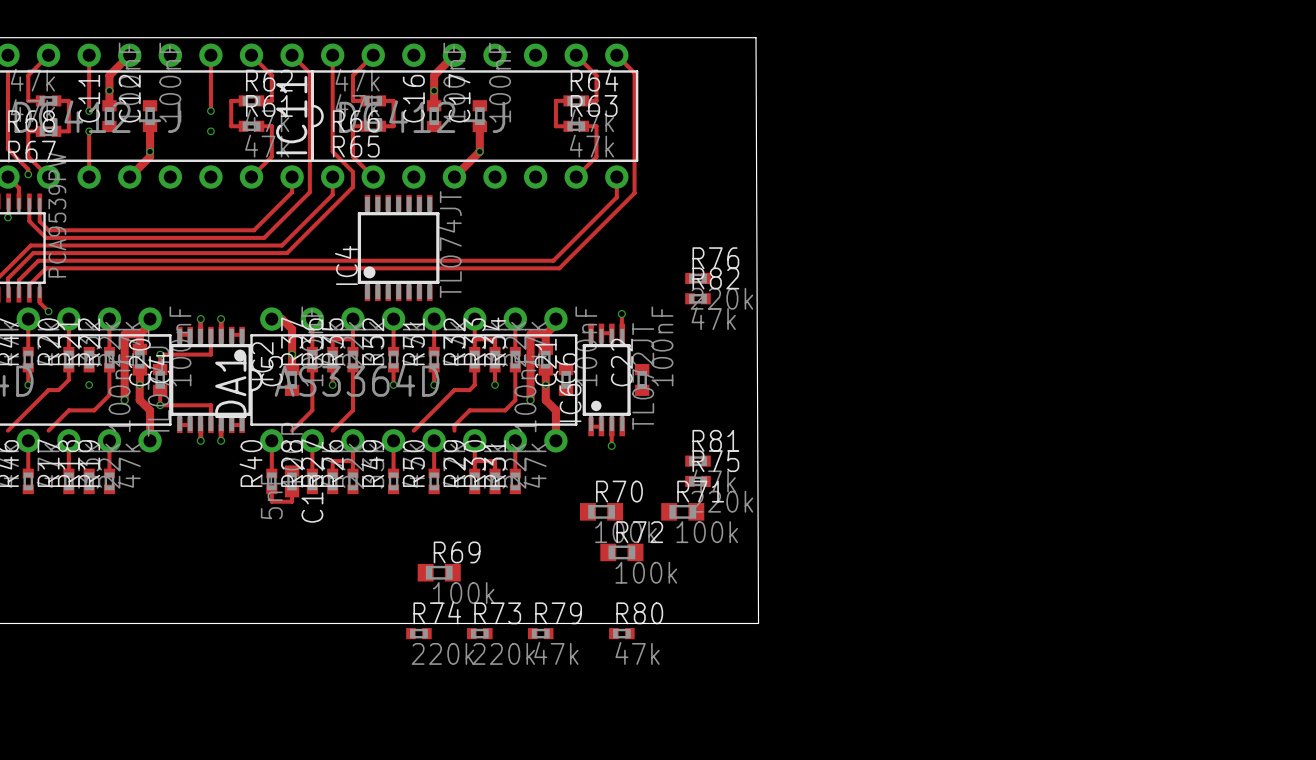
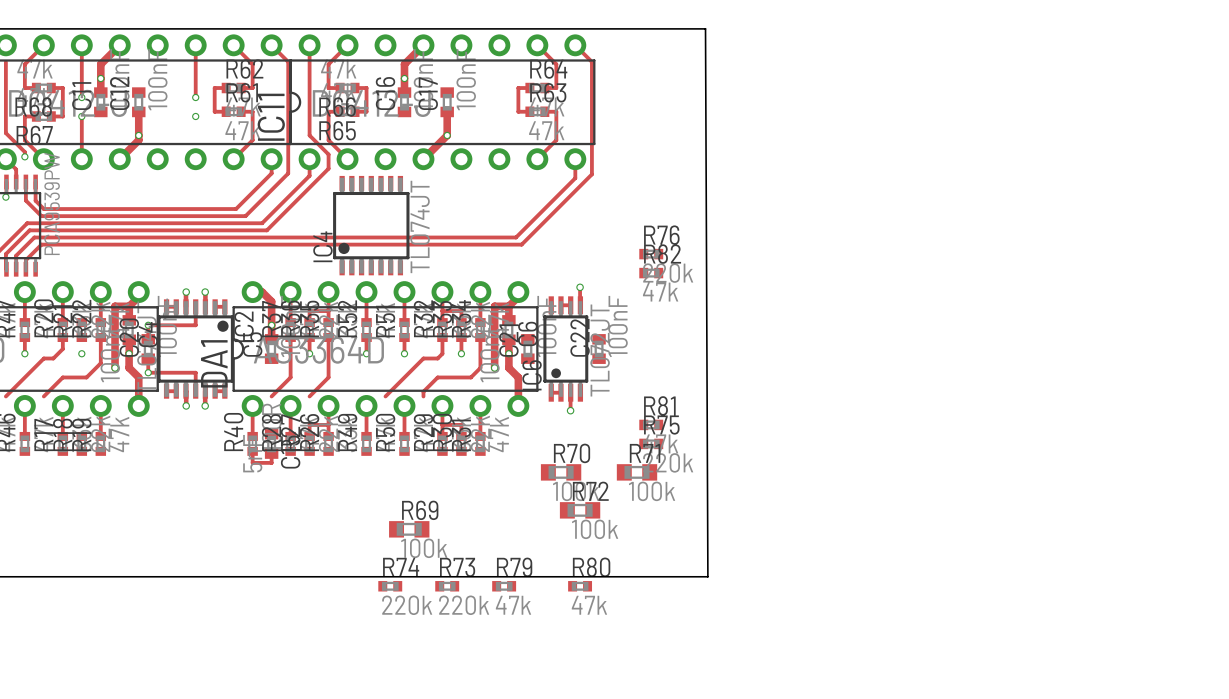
track: (39, 294) (39, 302) (48, 311) -> none
via: (48, 311) -> none

